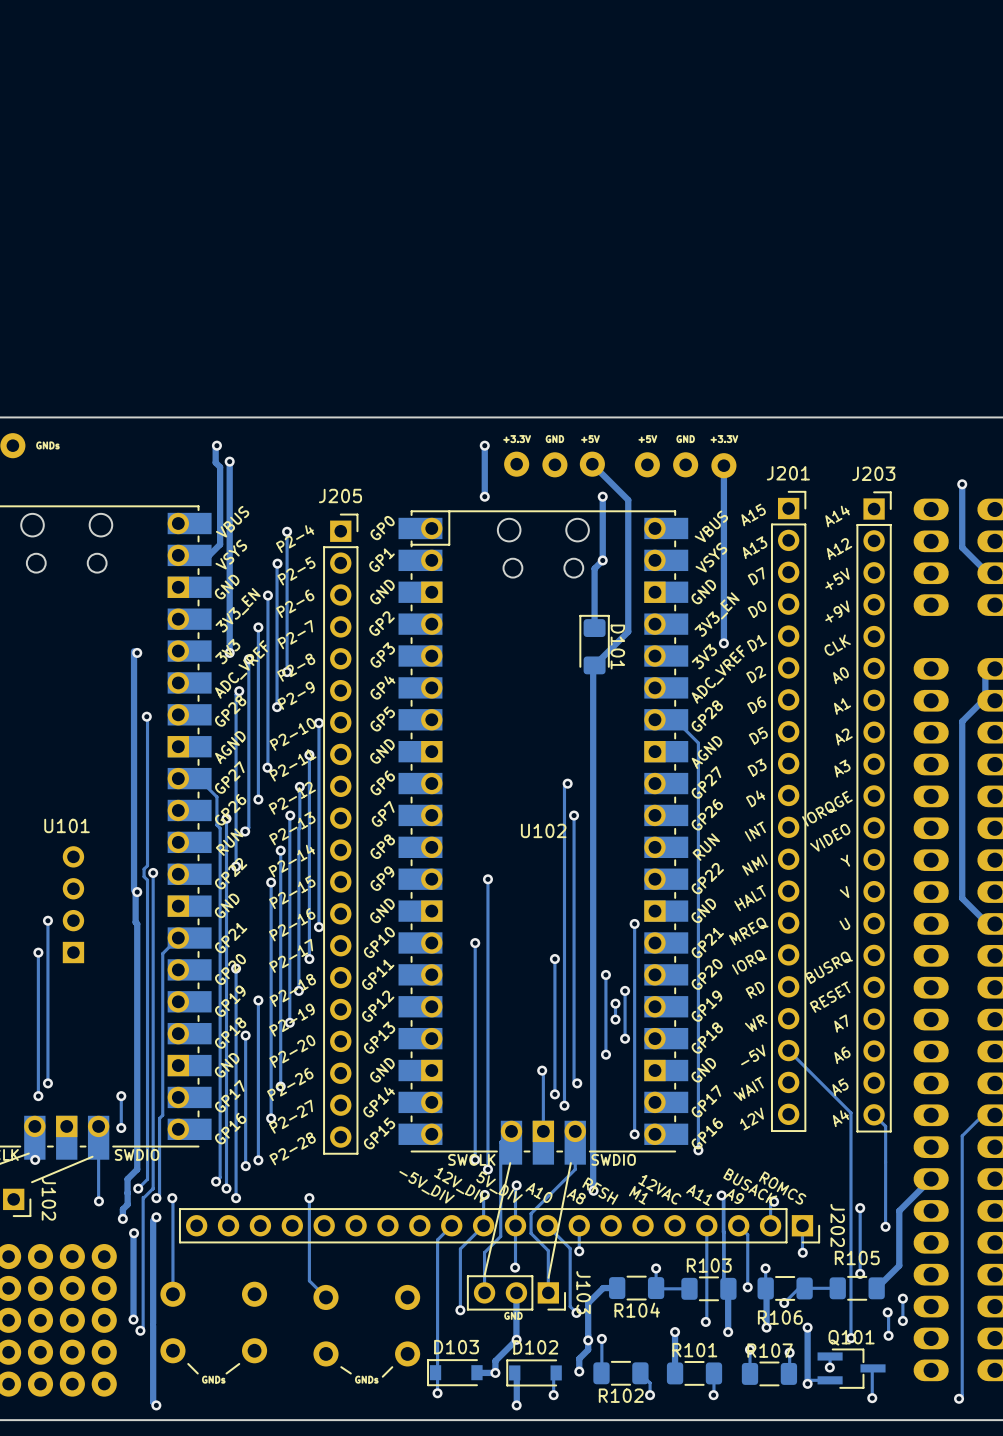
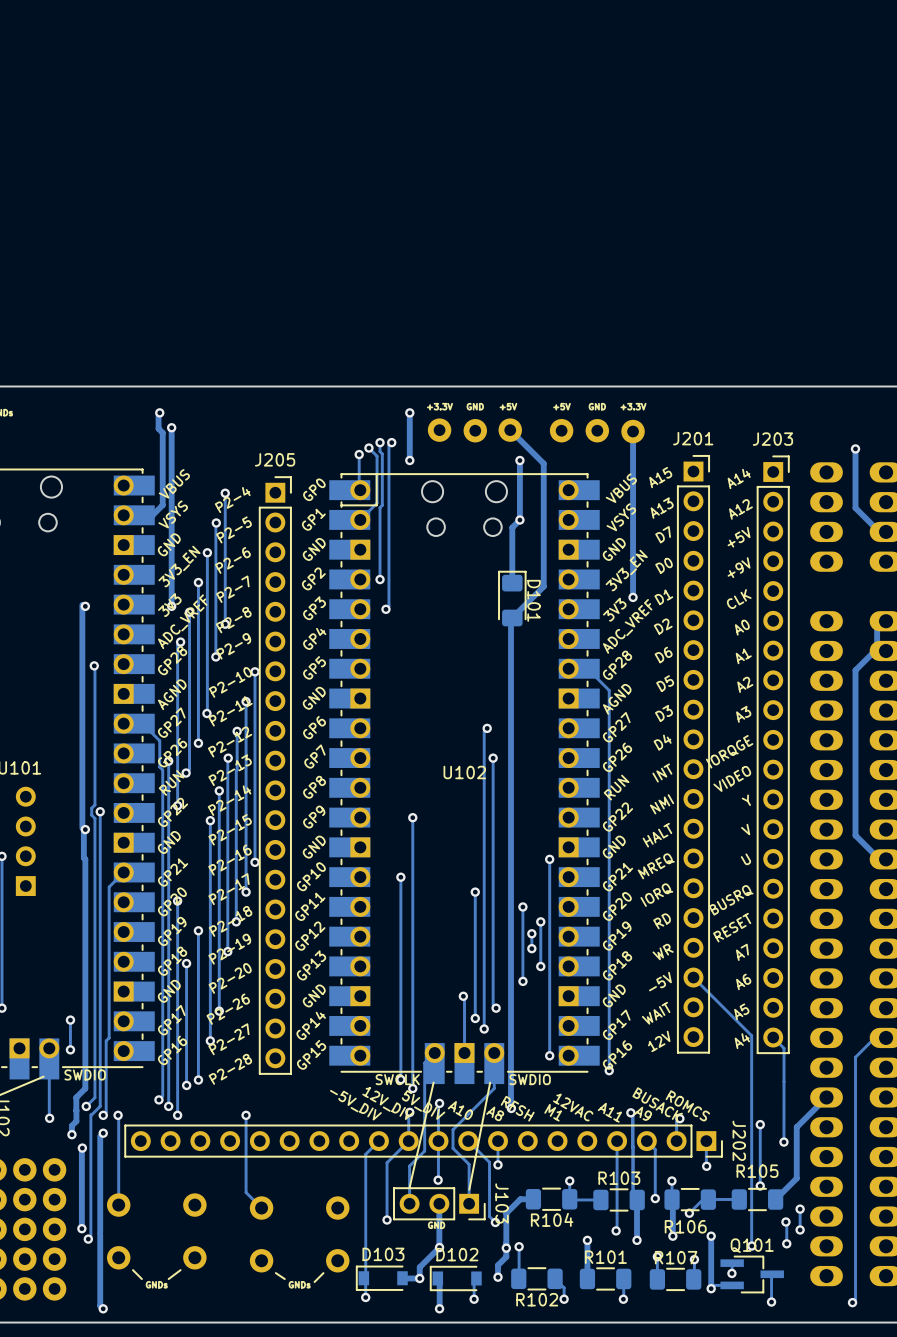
track: none -> (380, 442) (380, 451) (382, 453) (380, 579)
via: none -> (380, 442)
track: none -> (391, 442) (388, 445) (388, 606) (385, 609)
via: none -> (391, 442)
track: none -> (368, 448) (377, 456) (377, 503) (360, 519)
via: none -> (368, 448)
track: none -> (359, 454) (359, 489)
via: none -> (359, 454)
via: none -> (380, 579)
via: none -> (385, 609)

